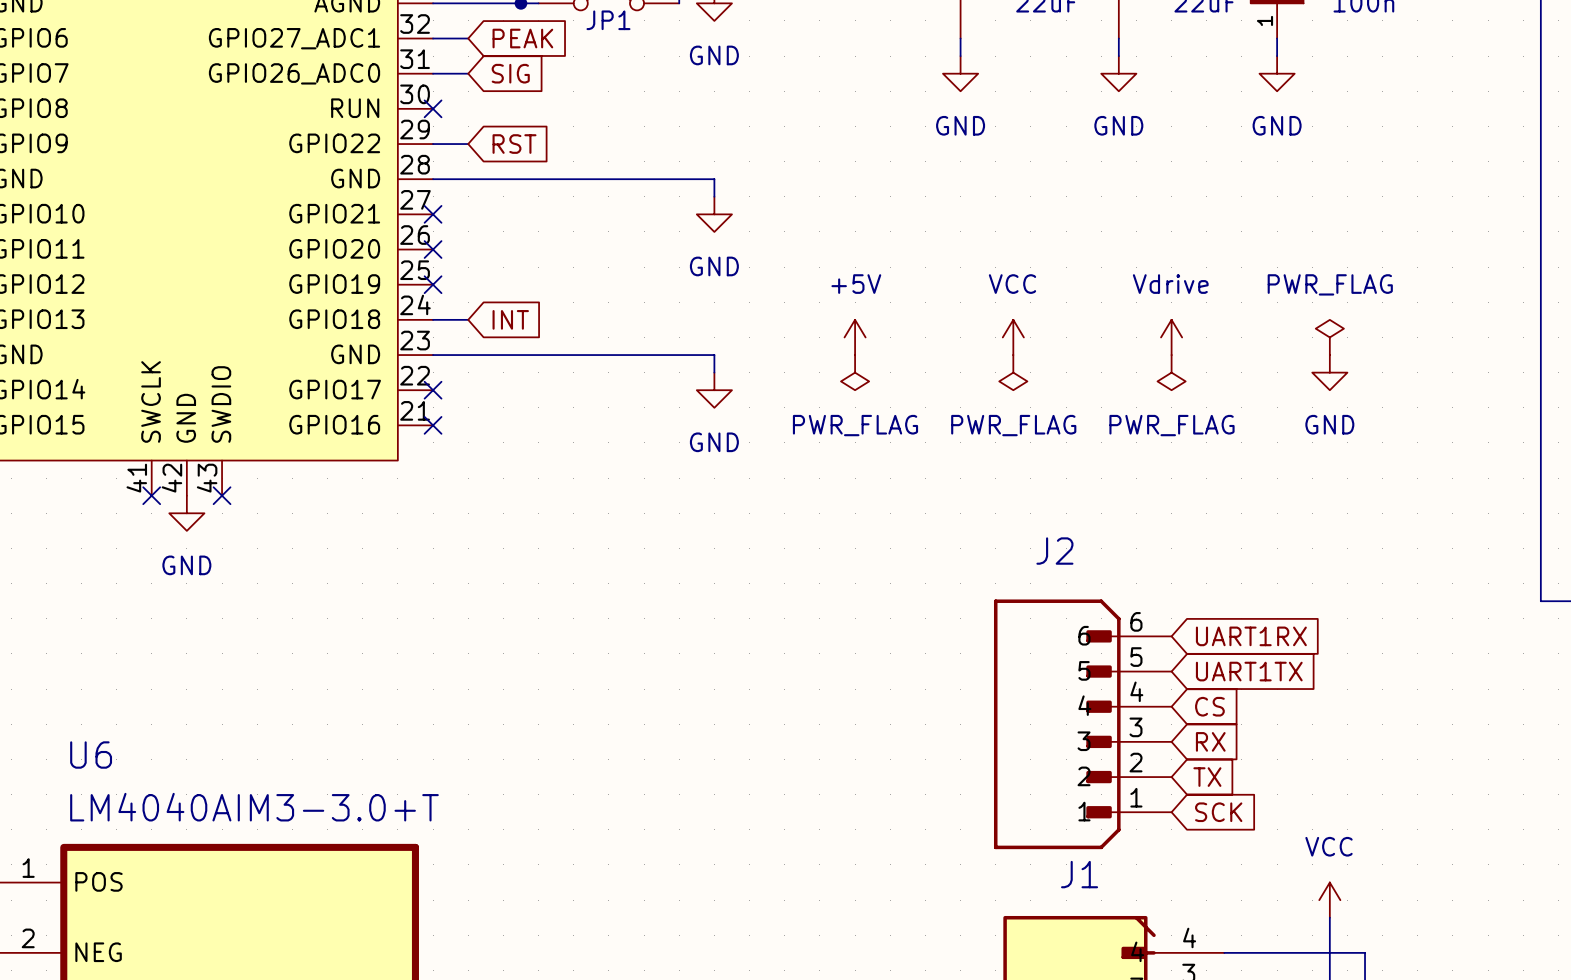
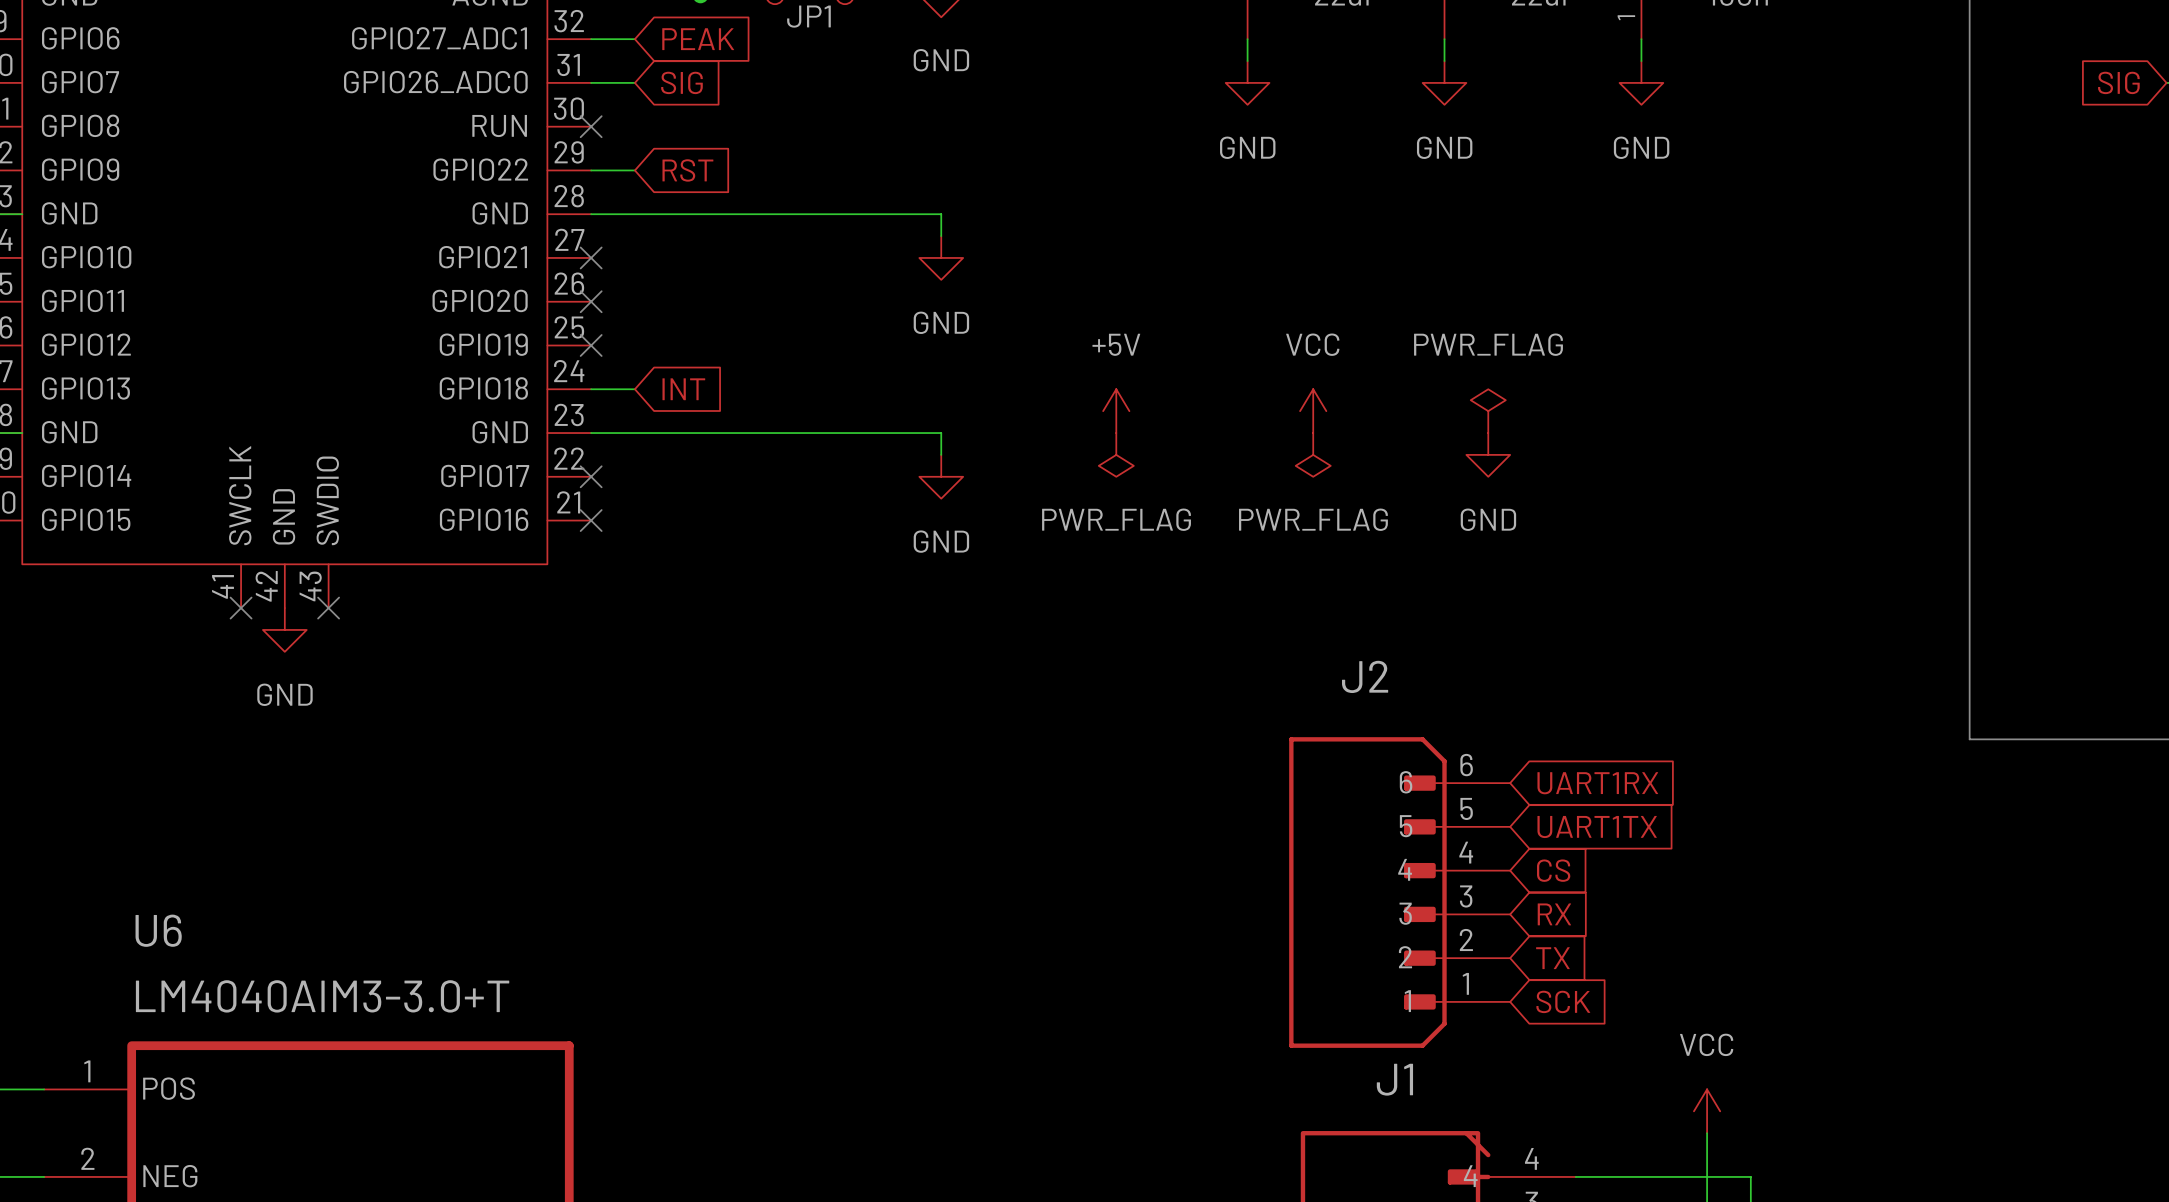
power symbol: Vdrive (1171, 337) -> none
power symbol: PWR_FLAG (1329, 337) -> none
power symbol rotation: 0° (1171, 372) -> 180° (1488, 411)
power symbol position: PWR_FLAG (1171, 372) -> PWR_FLAG (1488, 411)
power symbol position: GND (1329, 372) -> GND (1488, 454)

